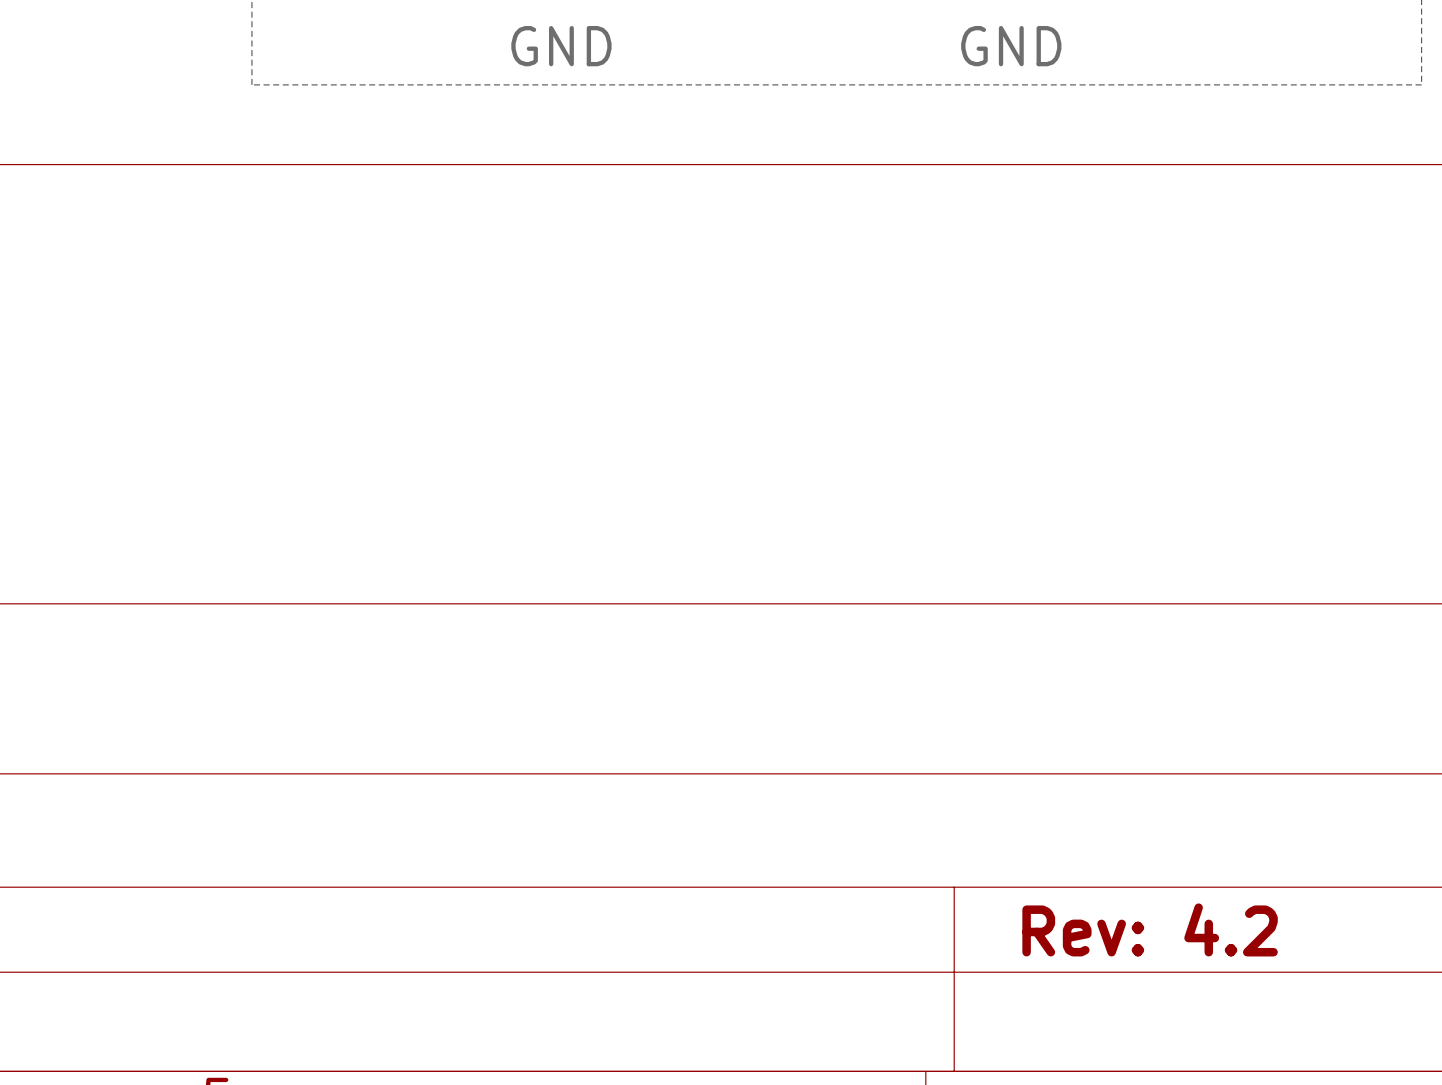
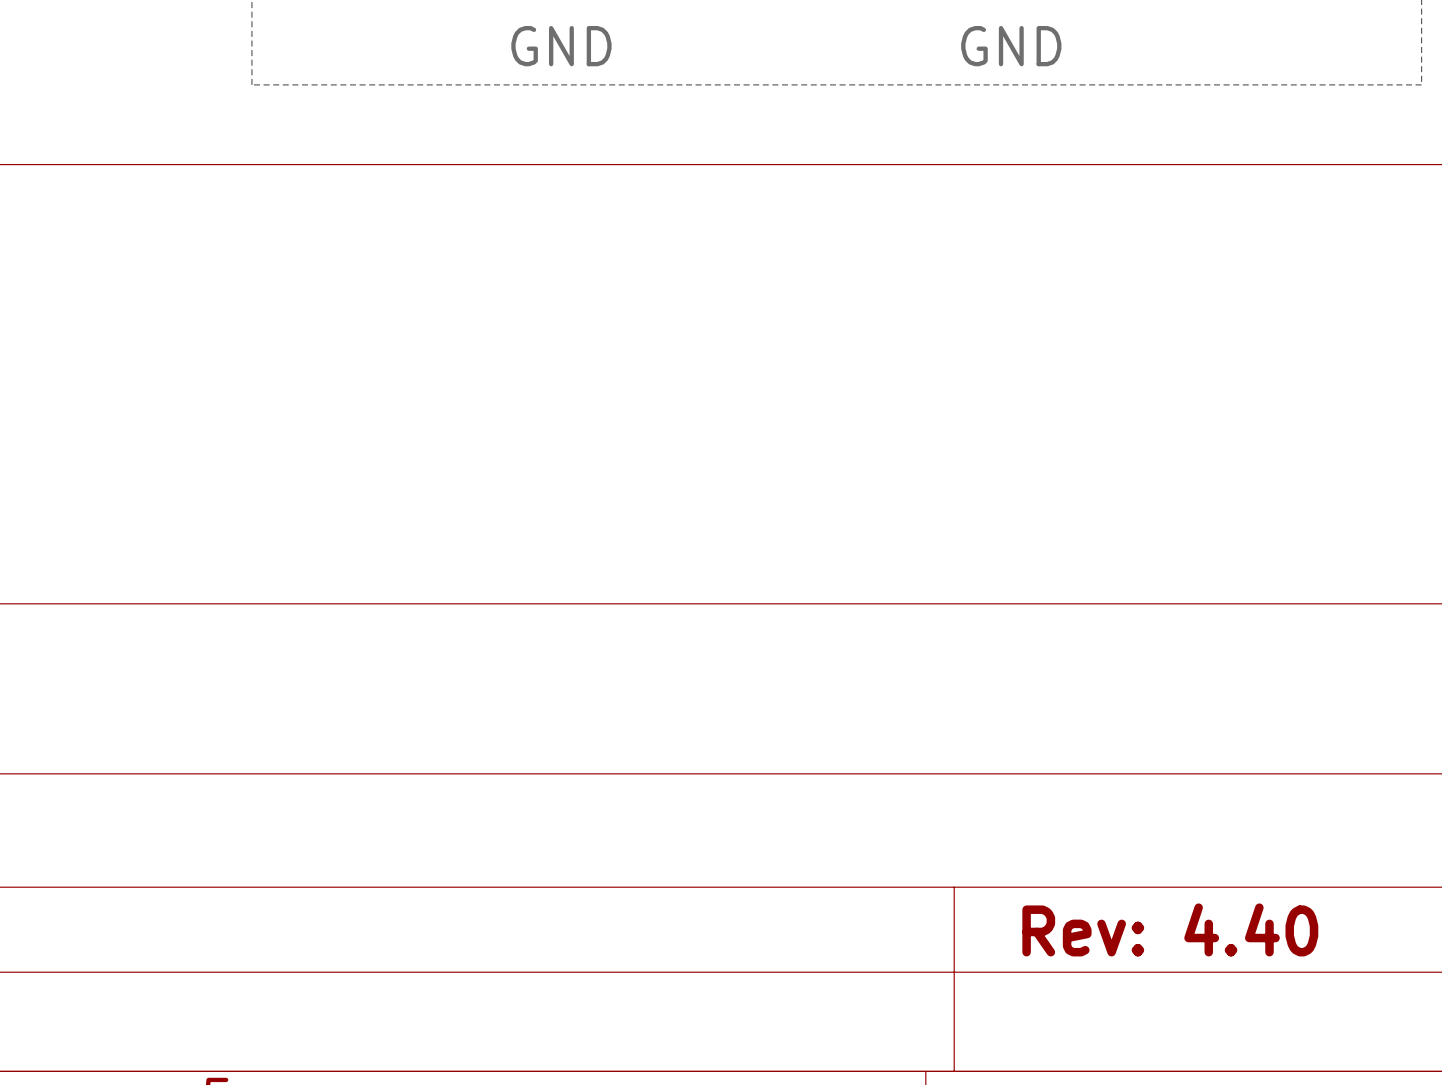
title block: Rev: 4.2 (1150, 929) -> Rev: 4.40 (1170, 929)

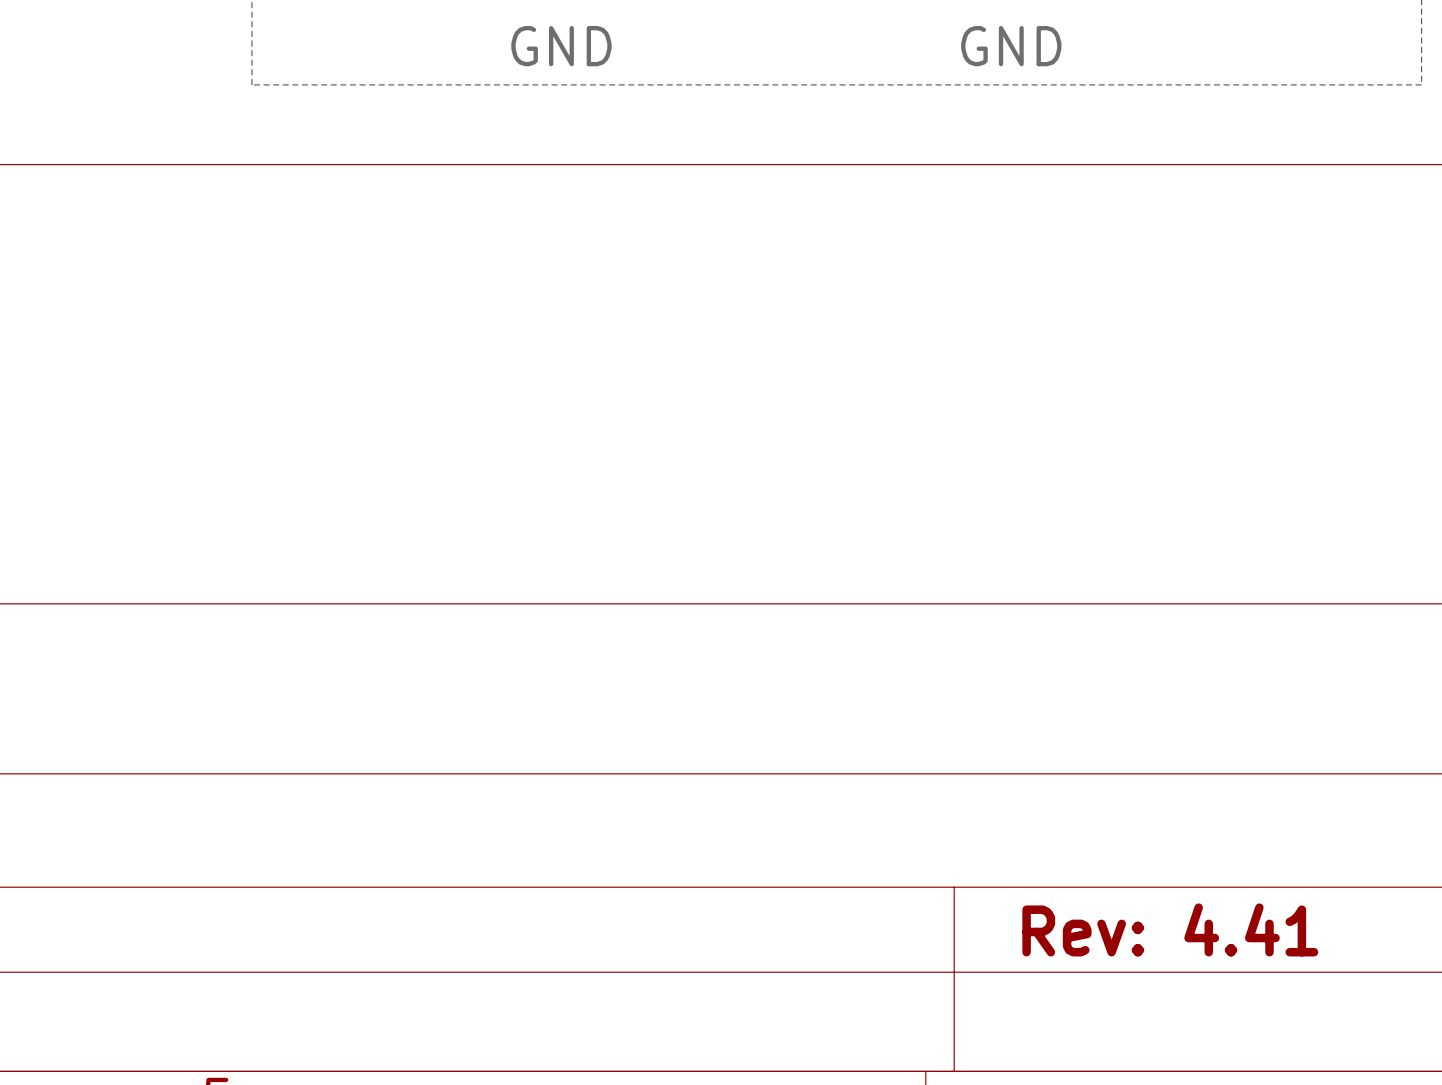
title block: Rev: 4.40 (1170, 929) -> Rev: 4.41 (1170, 929)

